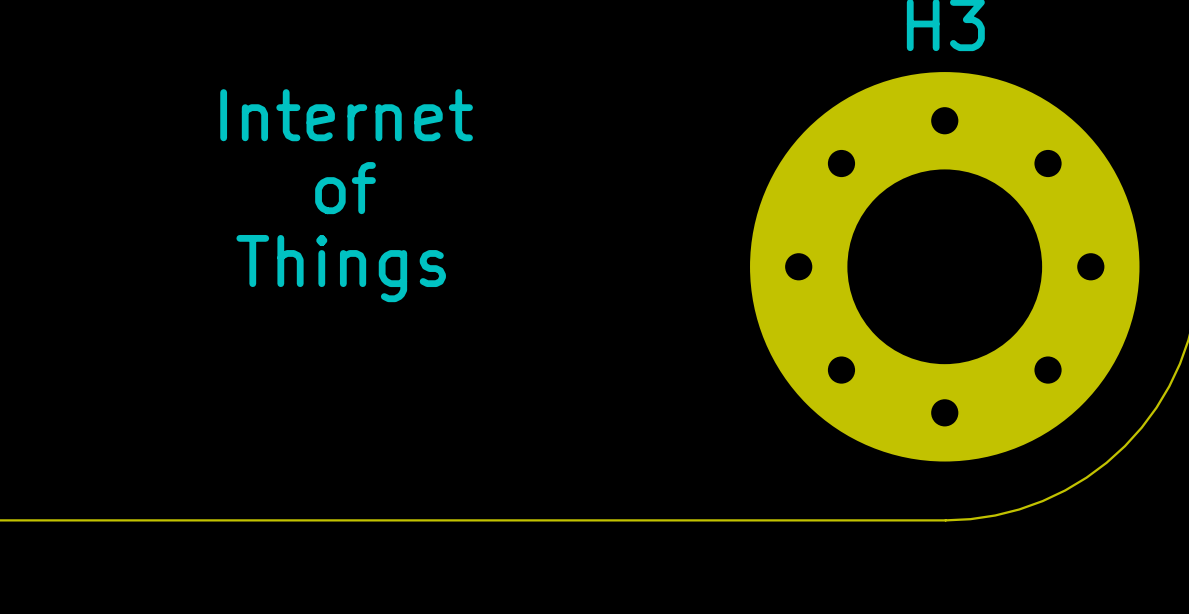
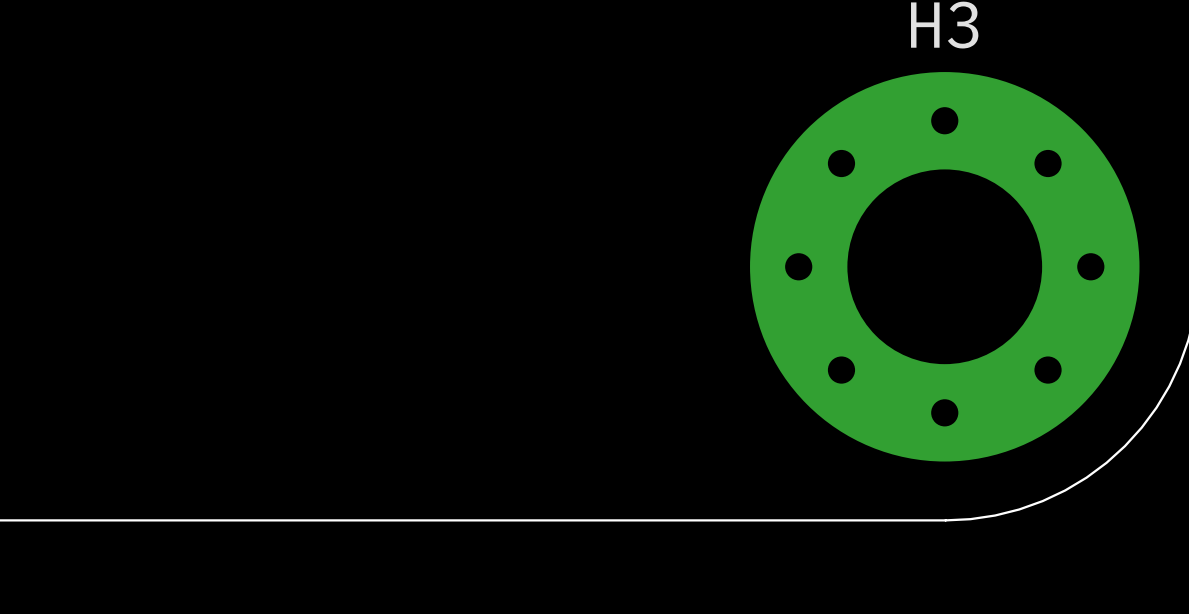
text: Internet (346, 115) -> none
text: of (345, 188) -> none
text: Things (341, 268) -> none

